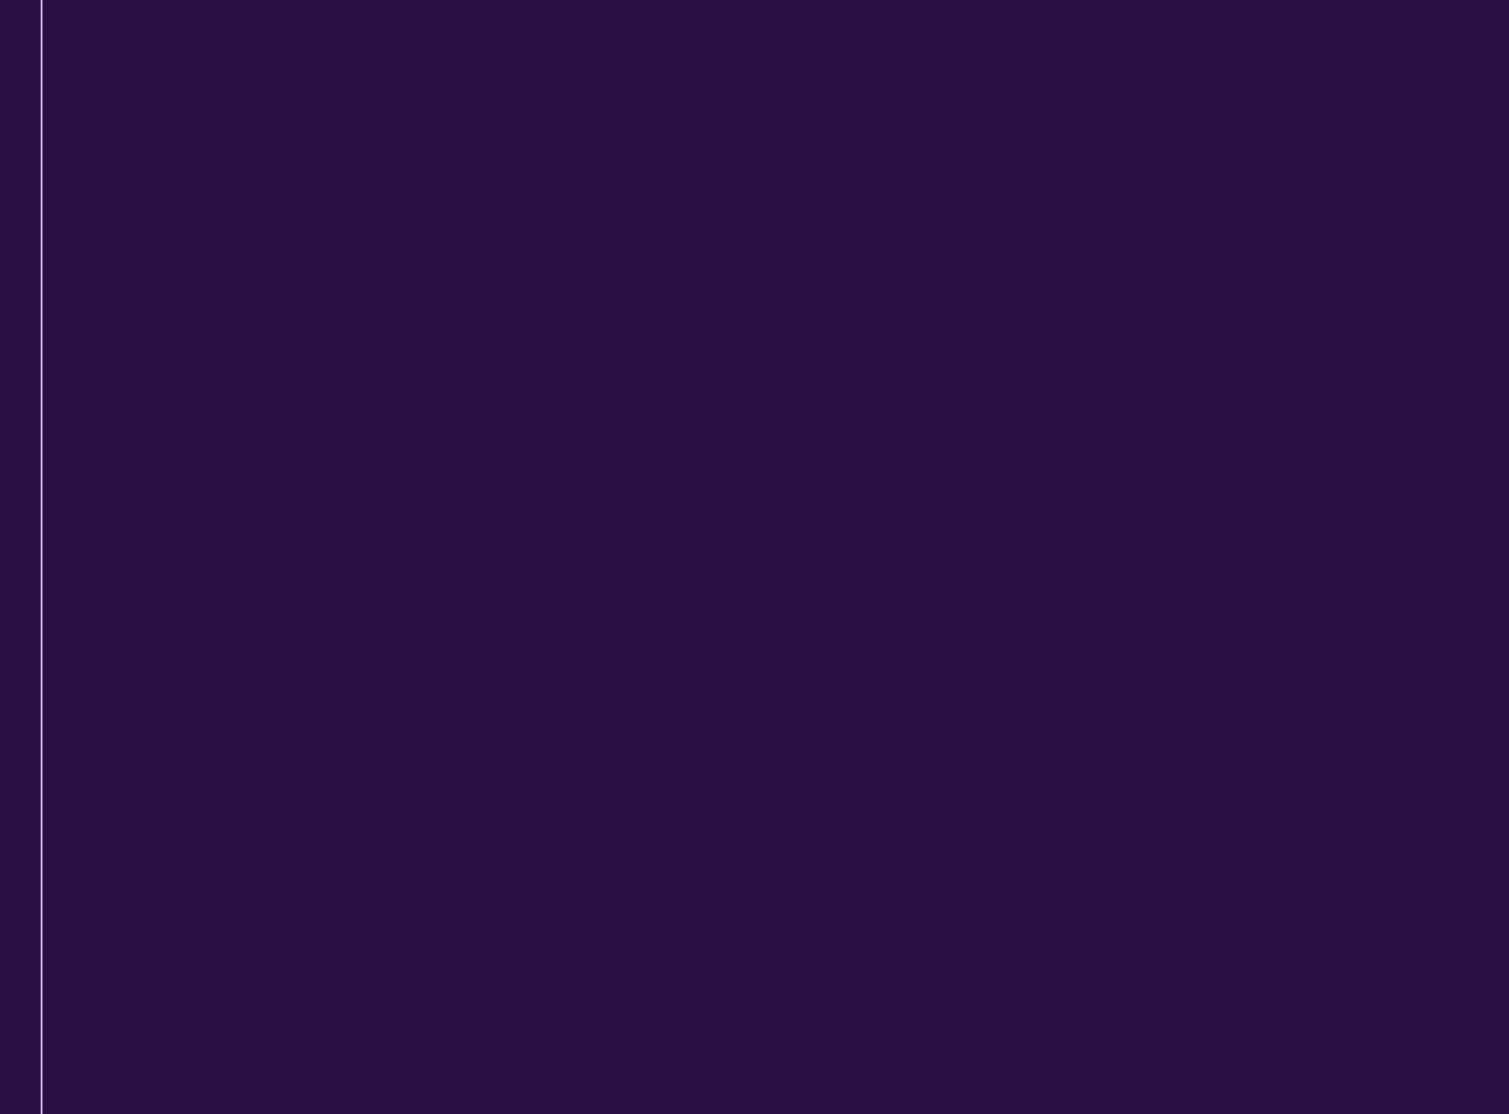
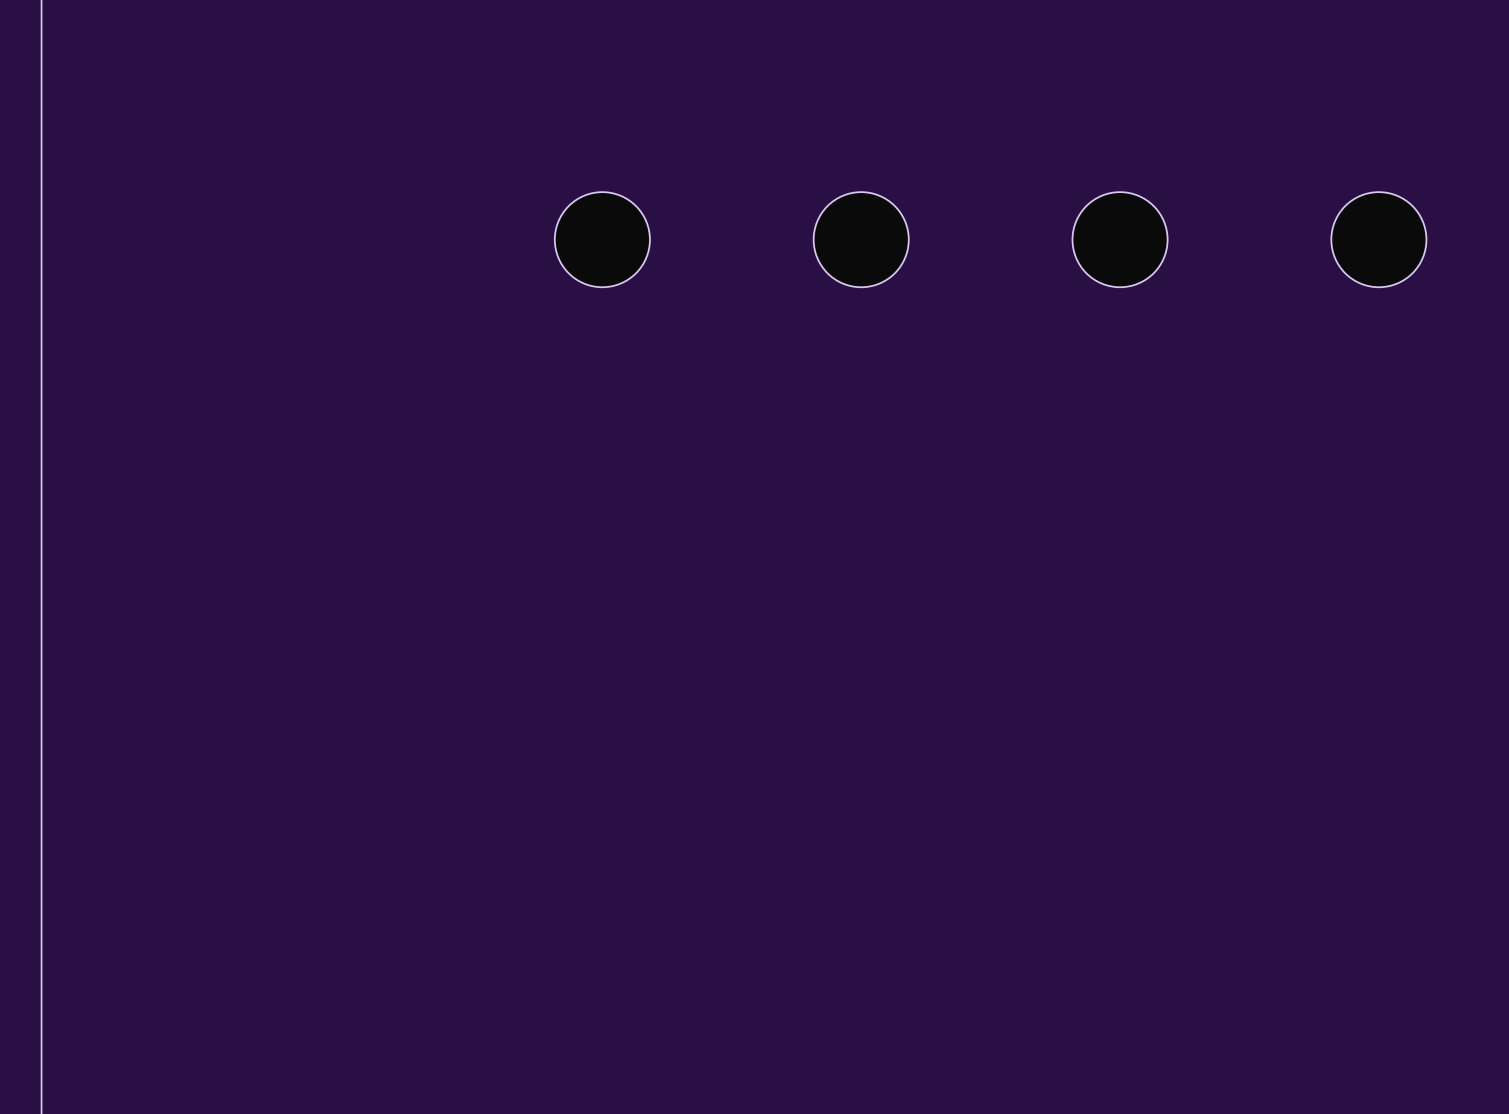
part: none -> (602, 239)
part: none -> (861, 239)
part: none -> (1120, 239)
part: none -> (1378, 239)

